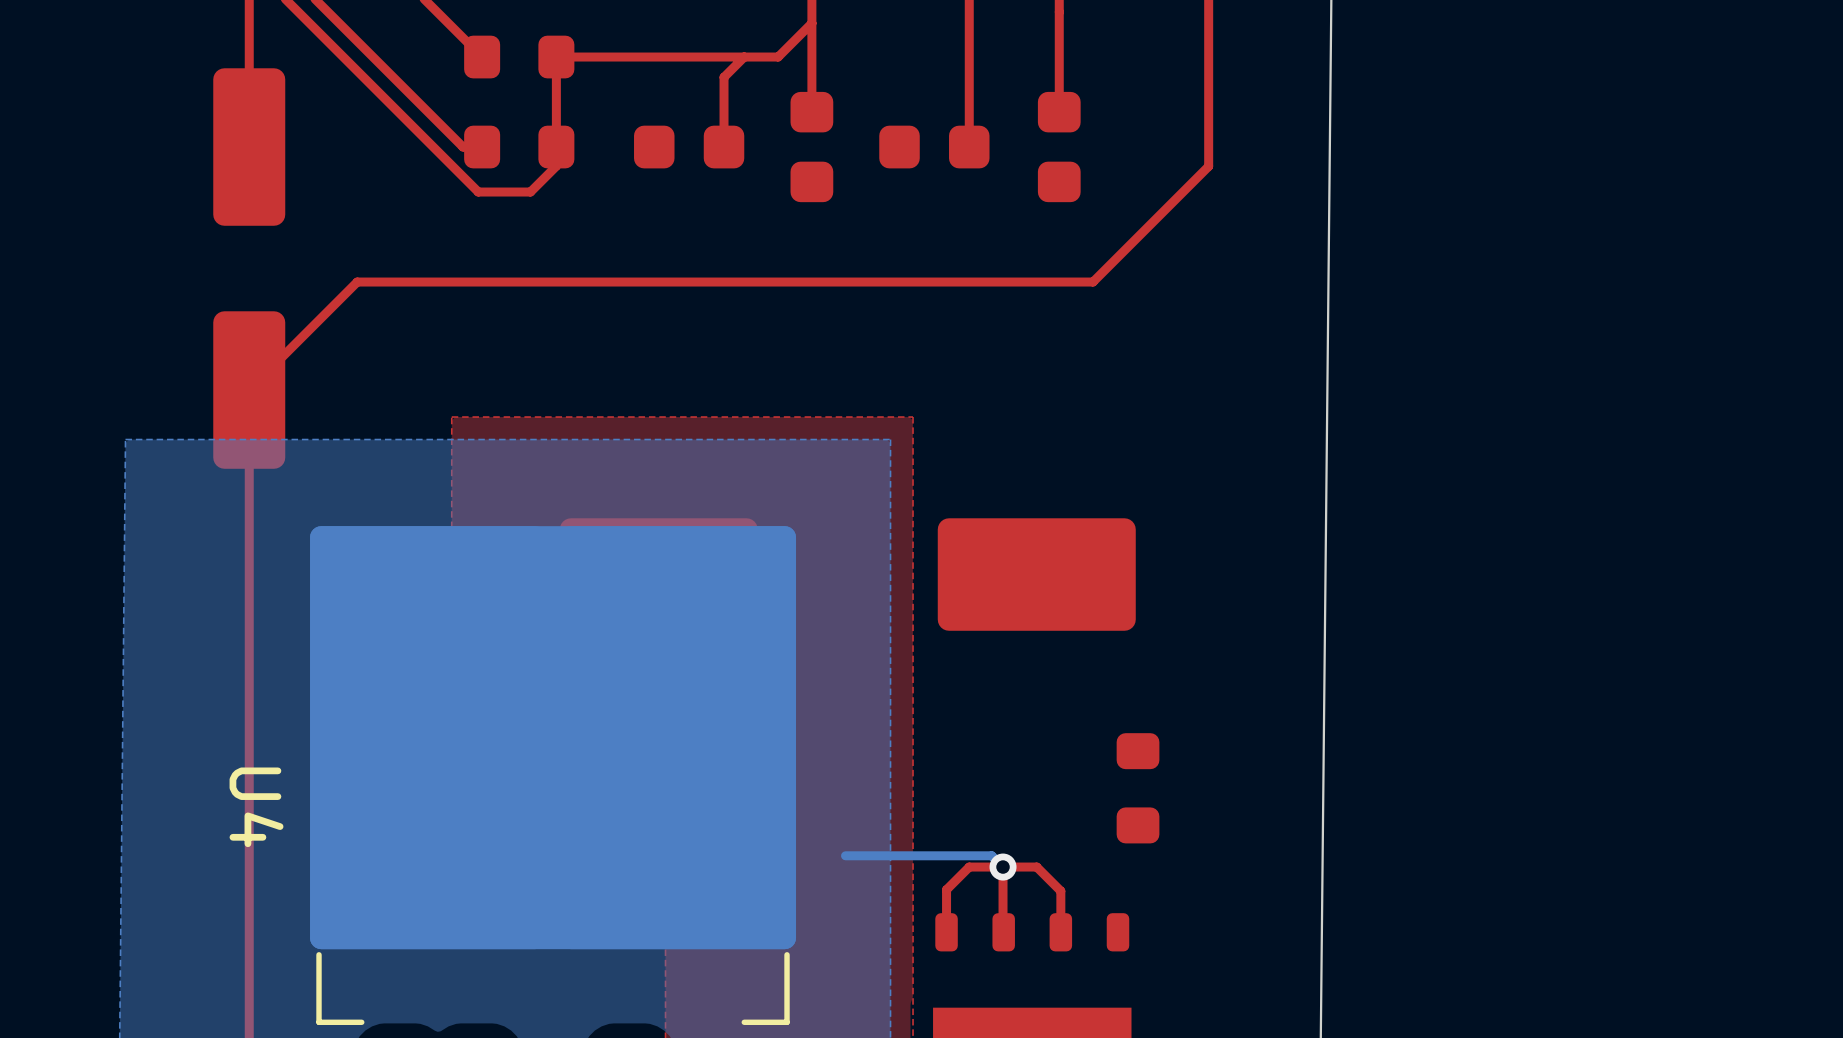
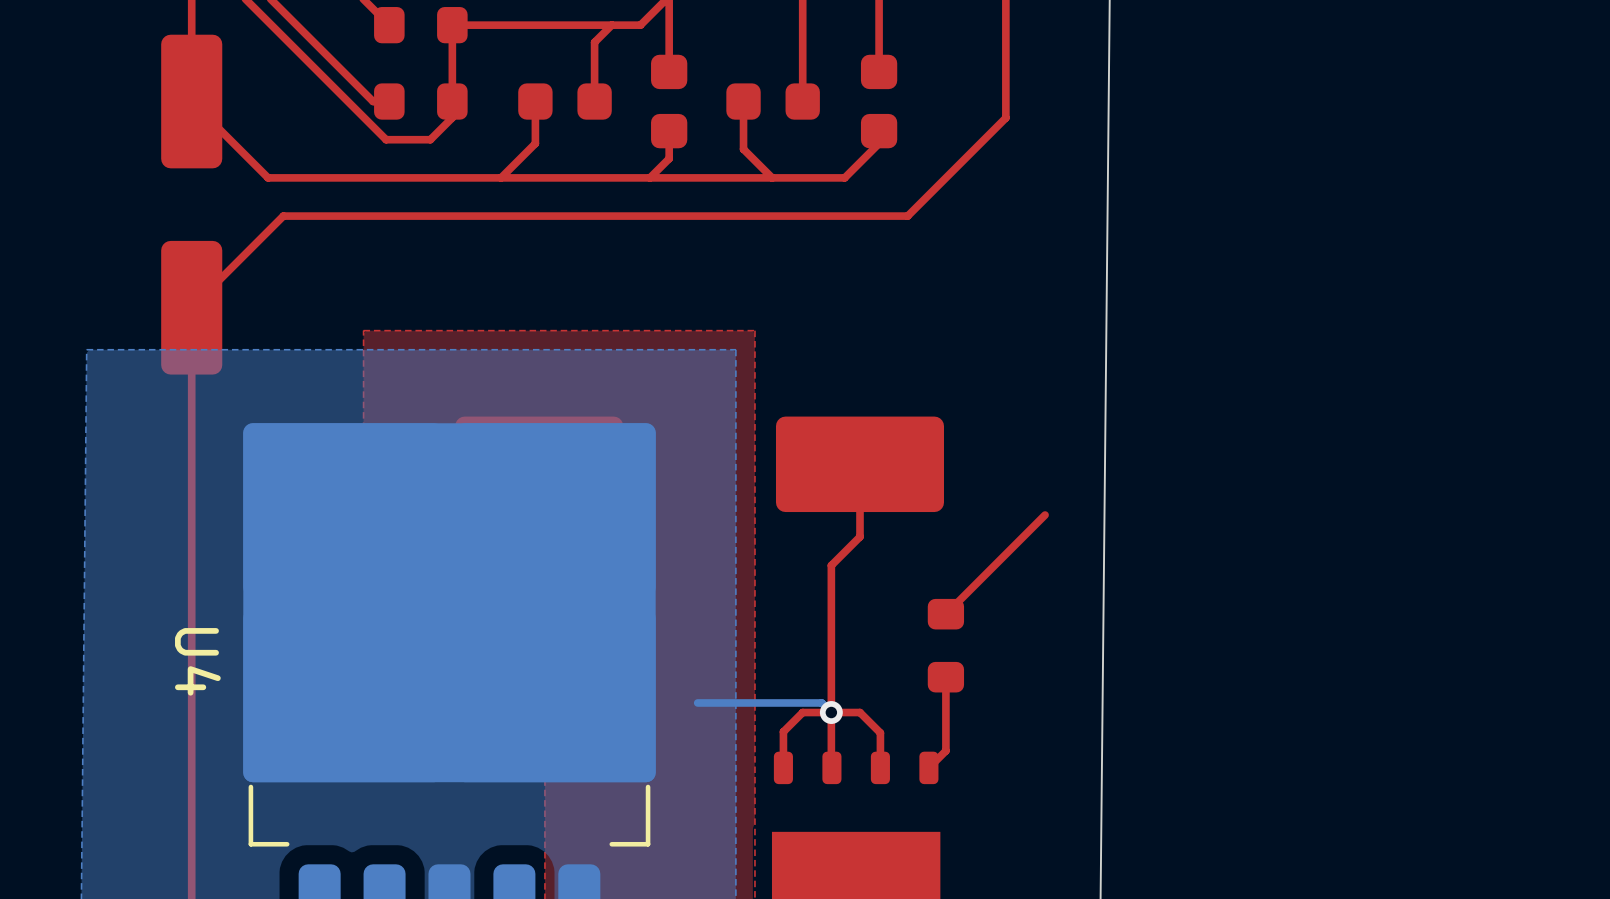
top track: none -> (191, 101) (268, 177) (844, 177) (879, 143) (879, 131)
top track: none -> (535, 101) (535, 143) (501, 177)
top track: none -> (743, 101) (743, 149) (772, 177)
top track: none -> (669, 131) (669, 158) (649, 177)
top track: none -> (859, 464) (859, 536) (831, 565) (831, 712)
top track: none -> (1045, 515) (945, 614)
top track: none -> (945, 677) (945, 750) (928, 767)

